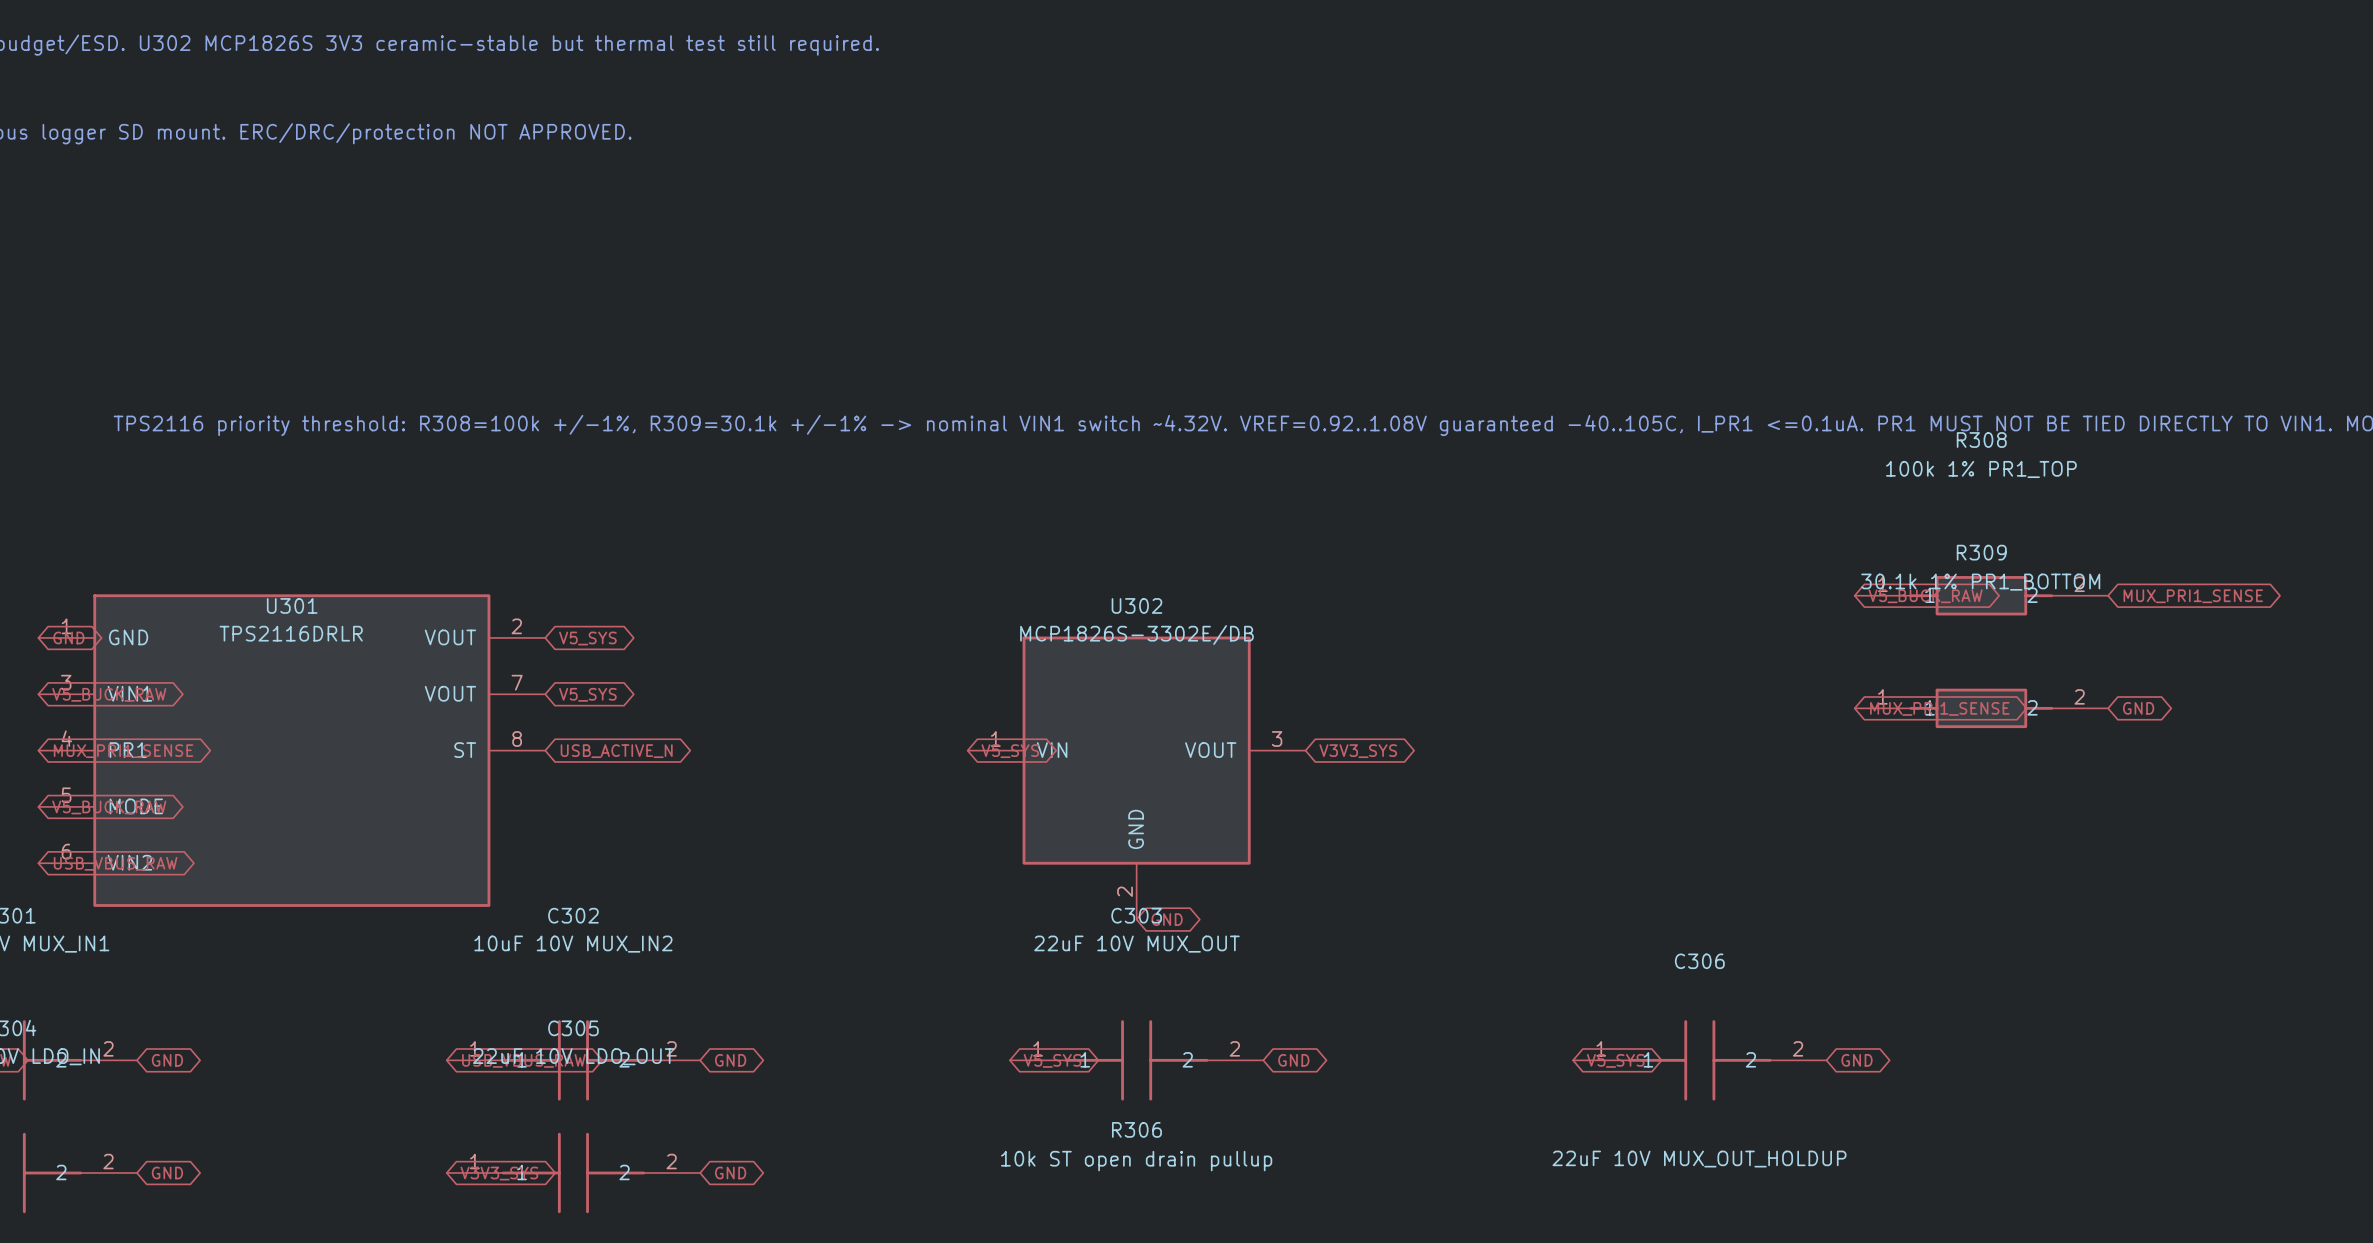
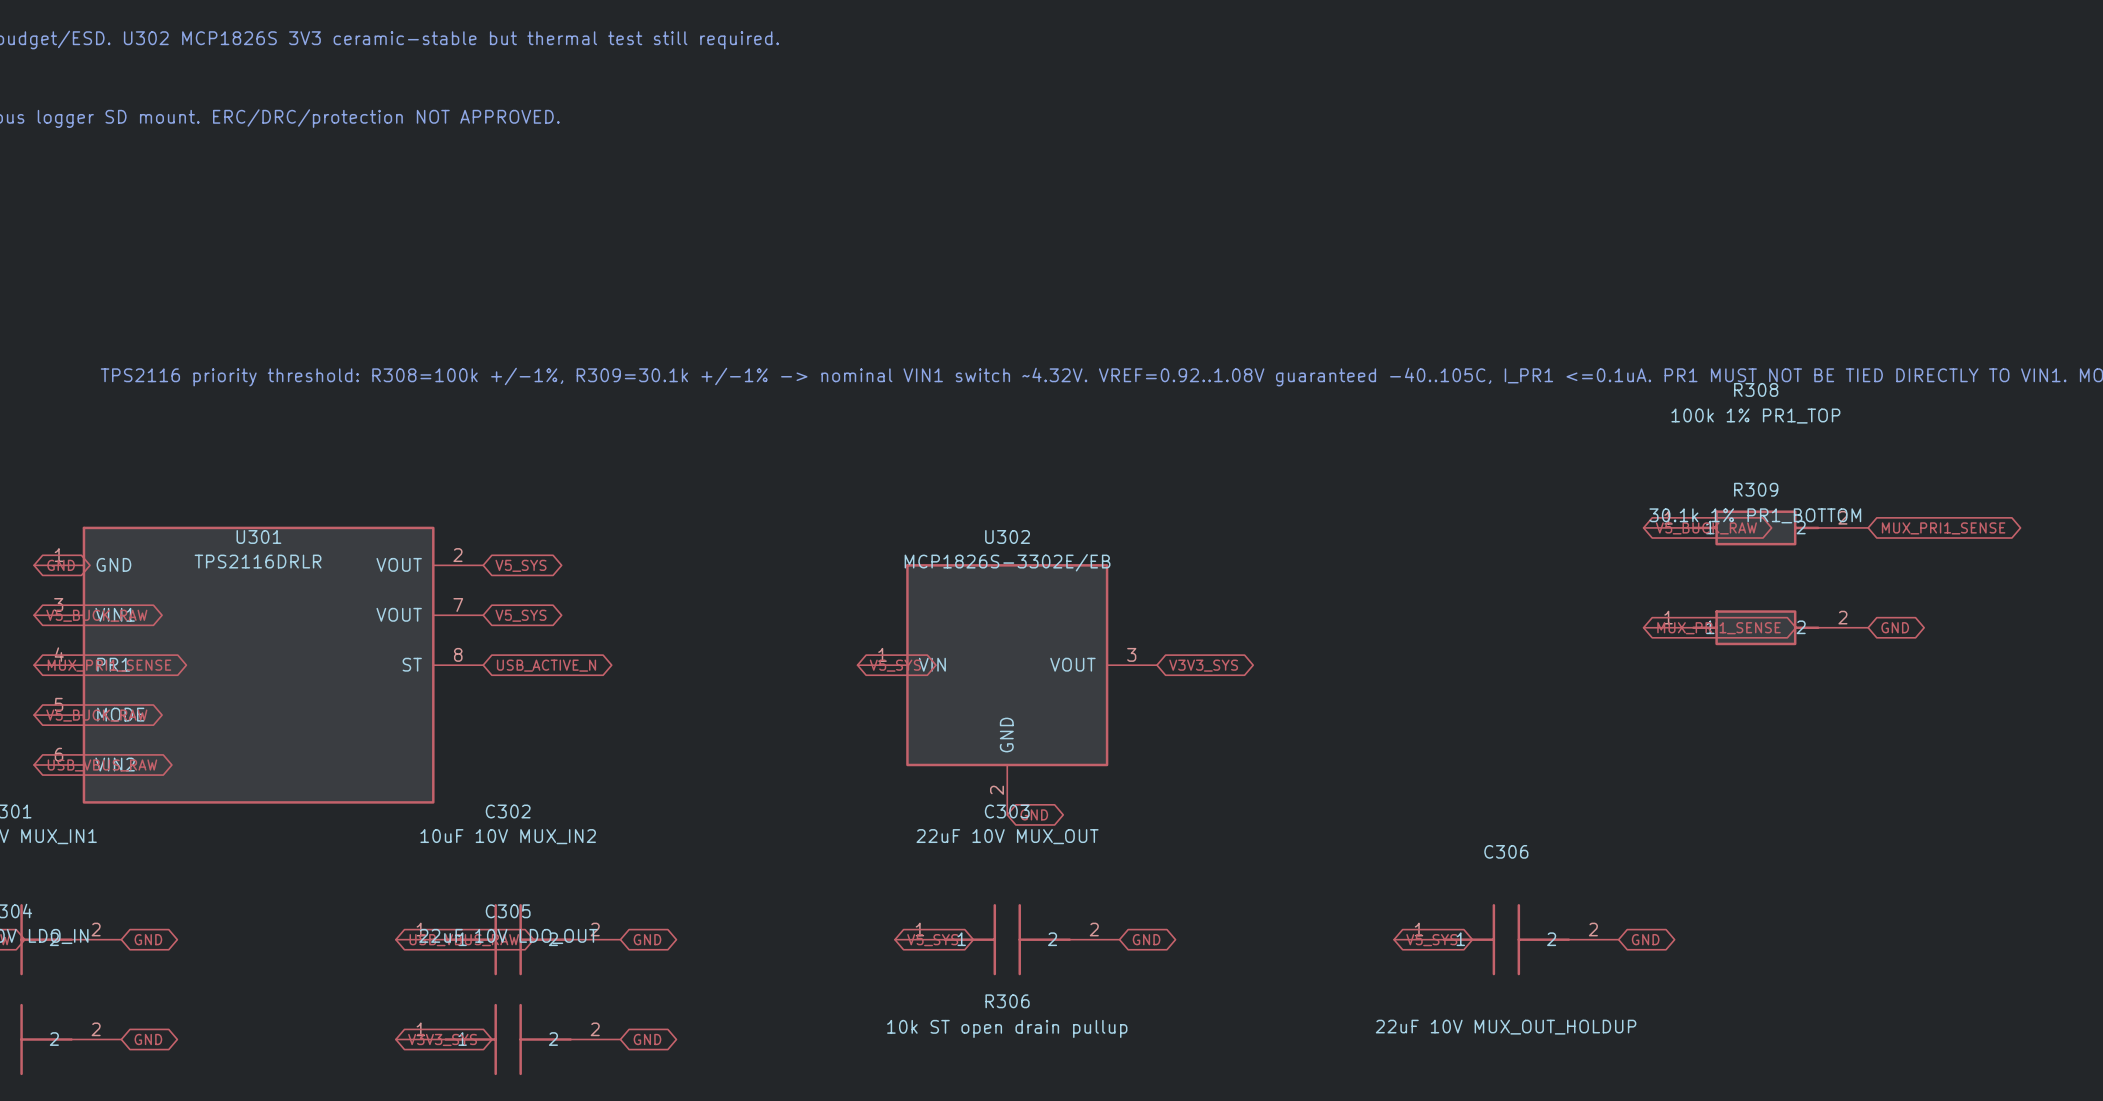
U302 value: MCP1826S-3302E/DB (1136, 635) -> MCP1826S-3302E/EB (1007, 562)

